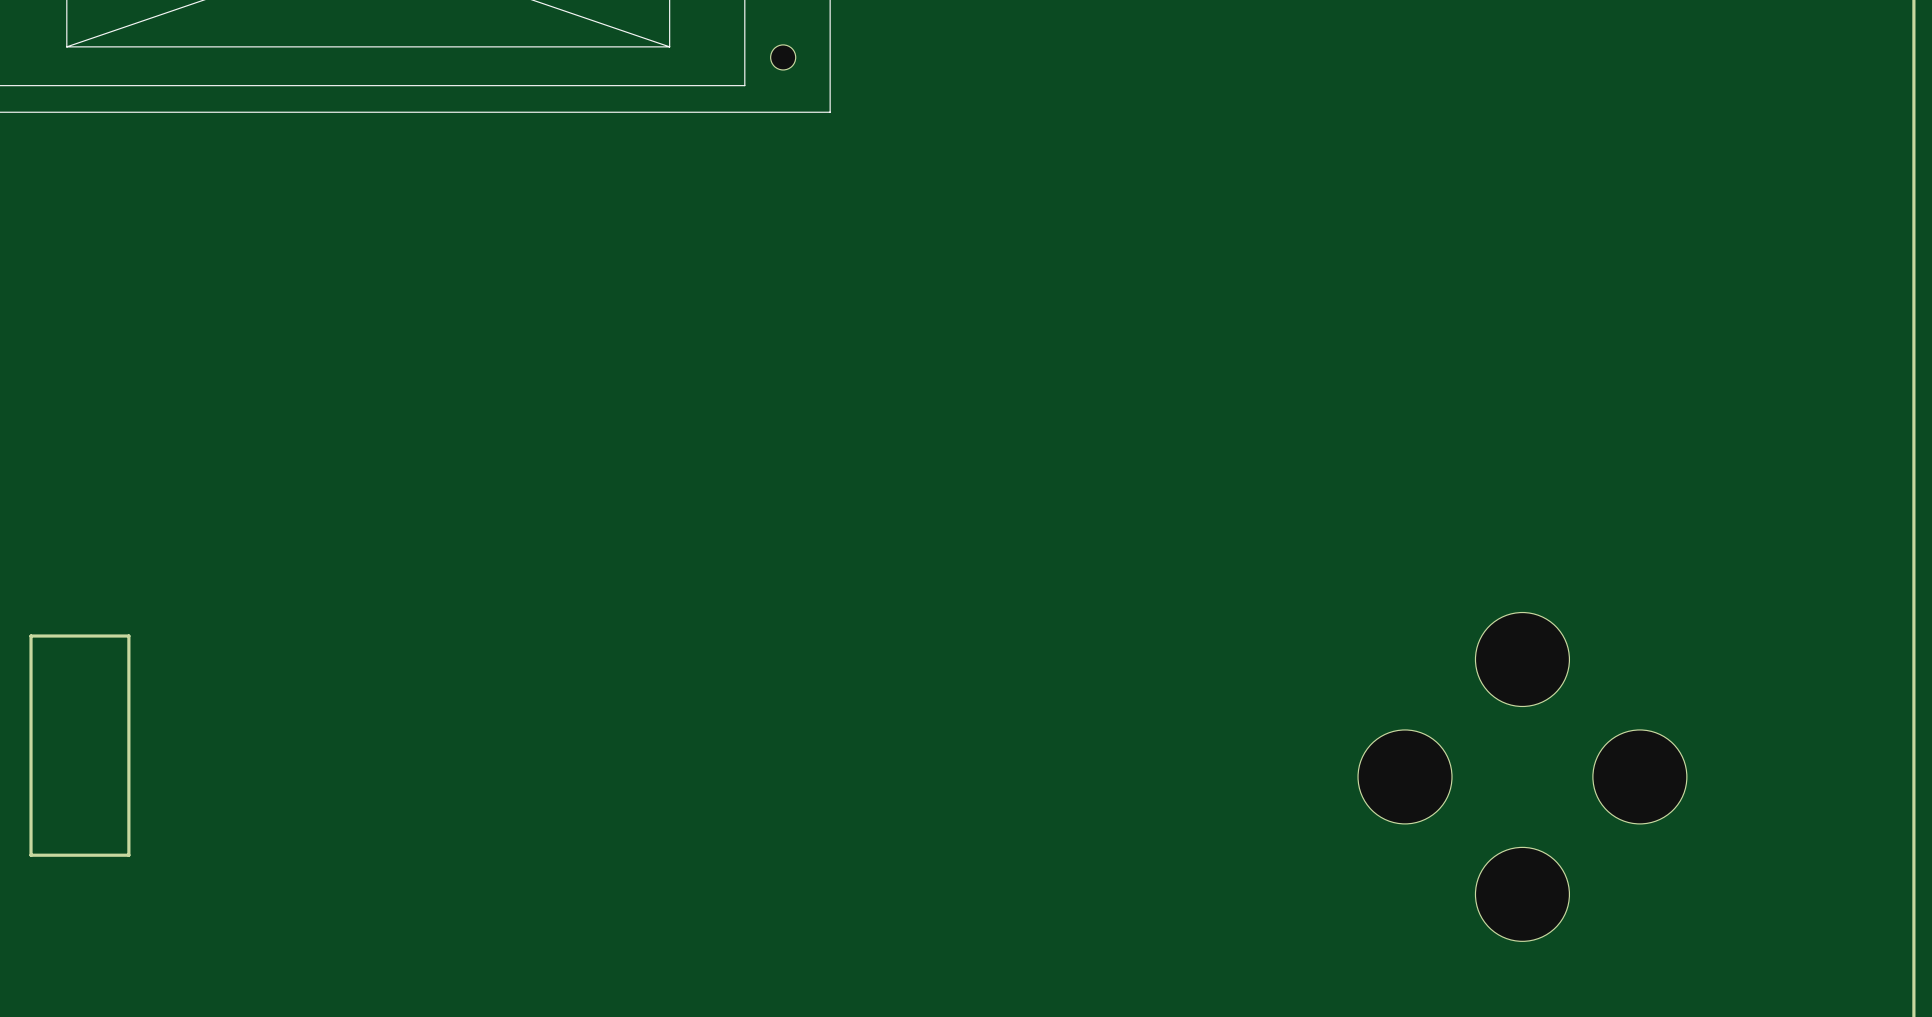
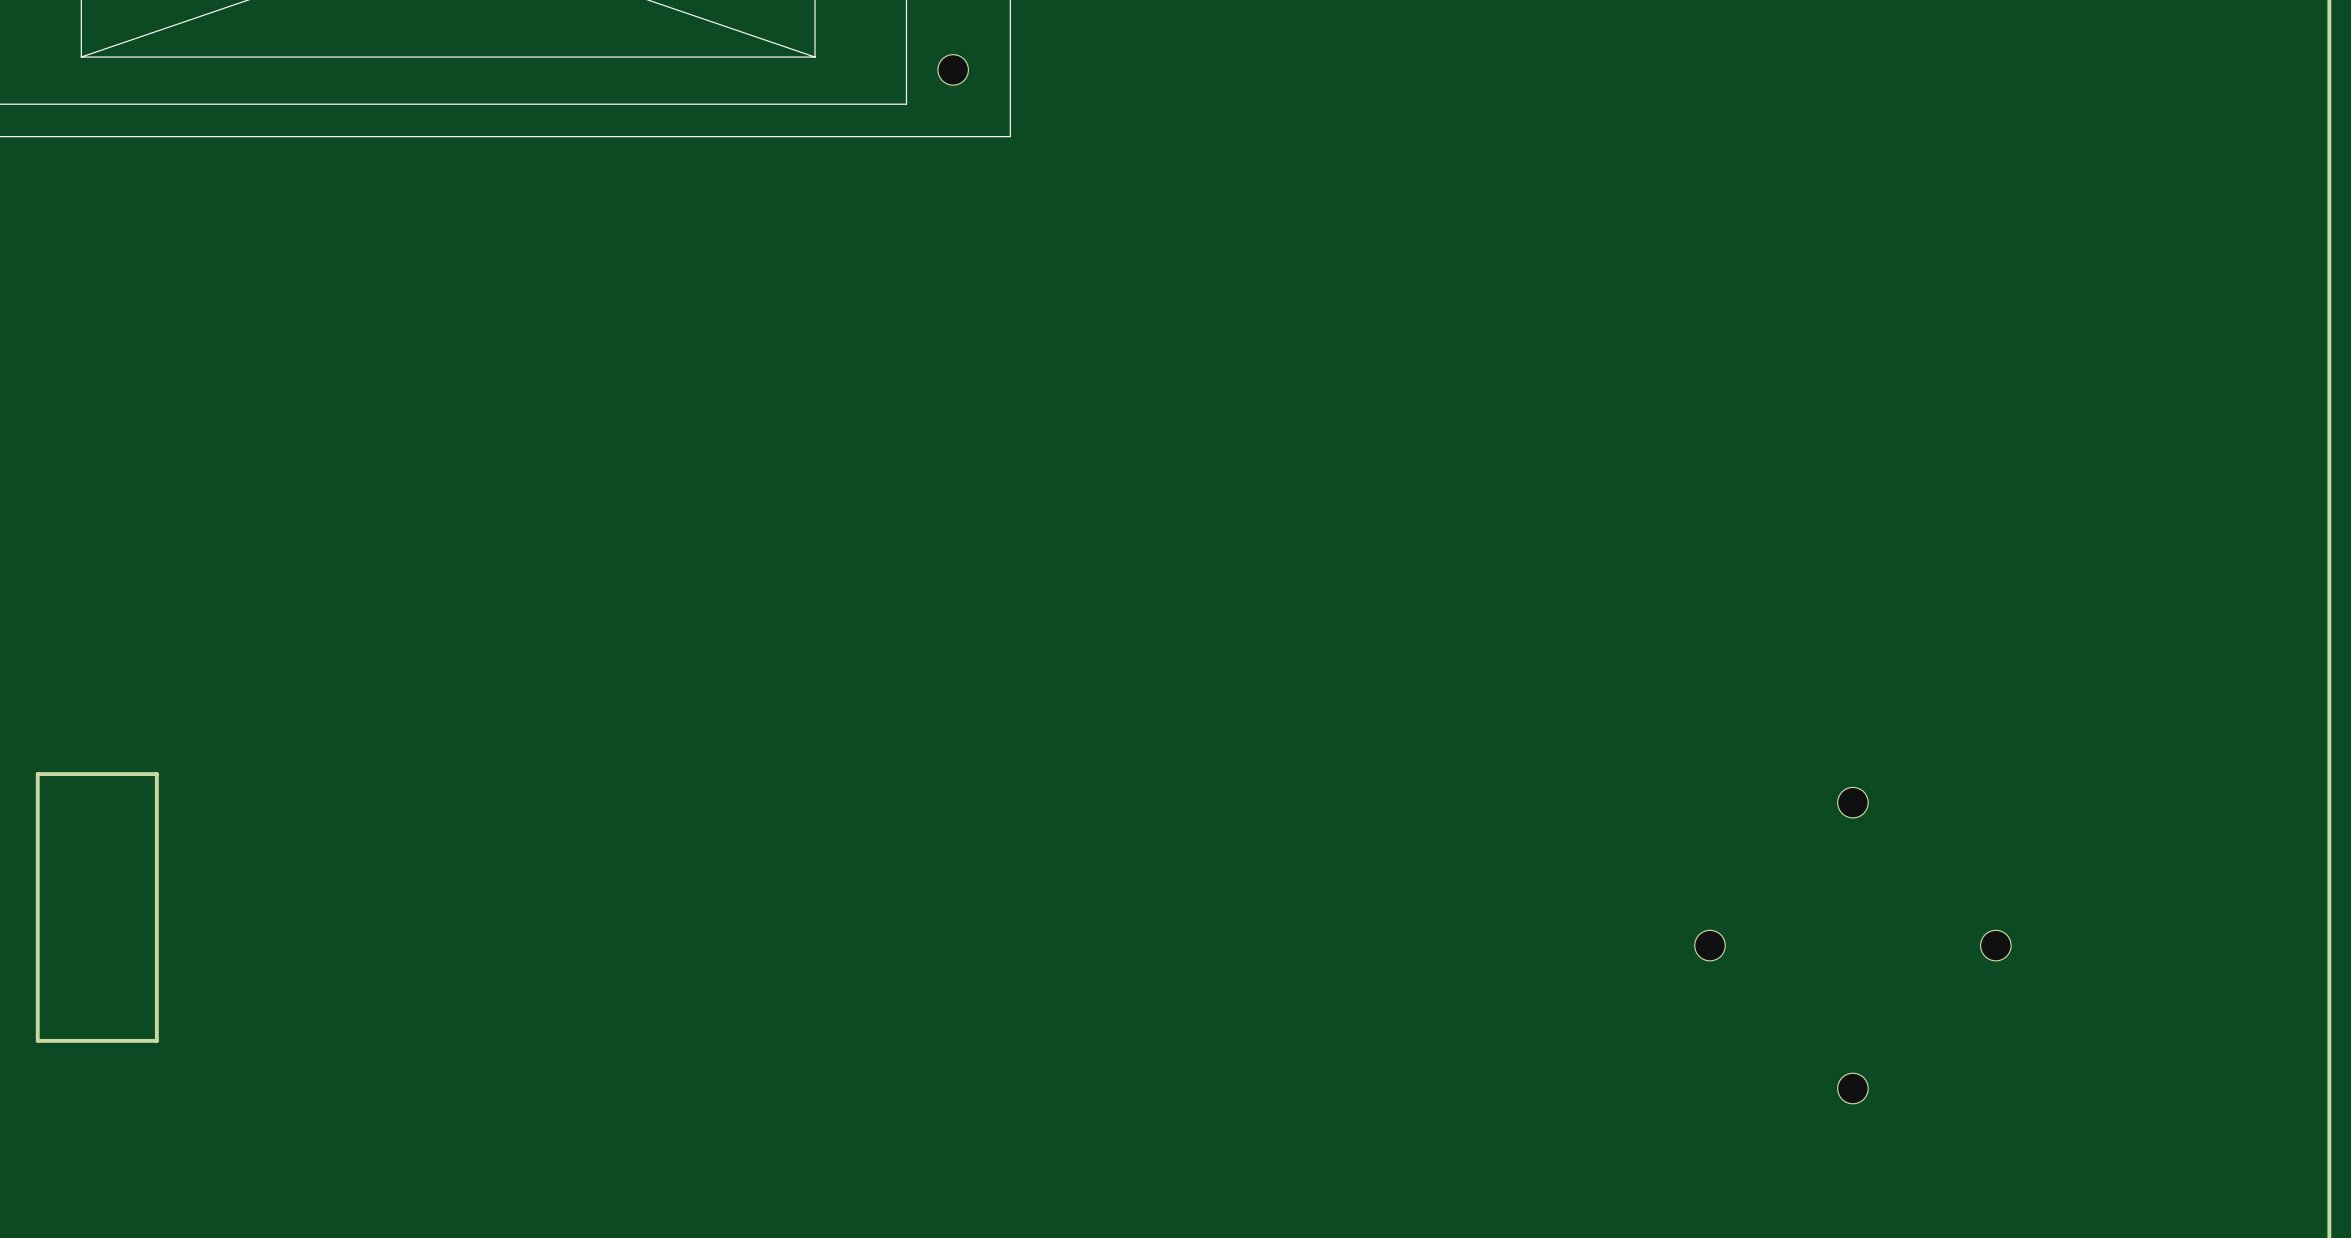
hole size: [1475, 612, 1570, 707] -> [1837, 787, 1869, 818]
hole size: [1358, 729, 1452, 824] -> [1694, 930, 1726, 961]
hole size: [1592, 729, 1687, 824] -> [1980, 930, 2012, 961]
hole size: [1475, 847, 1570, 942] -> [1837, 1073, 1869, 1104]

